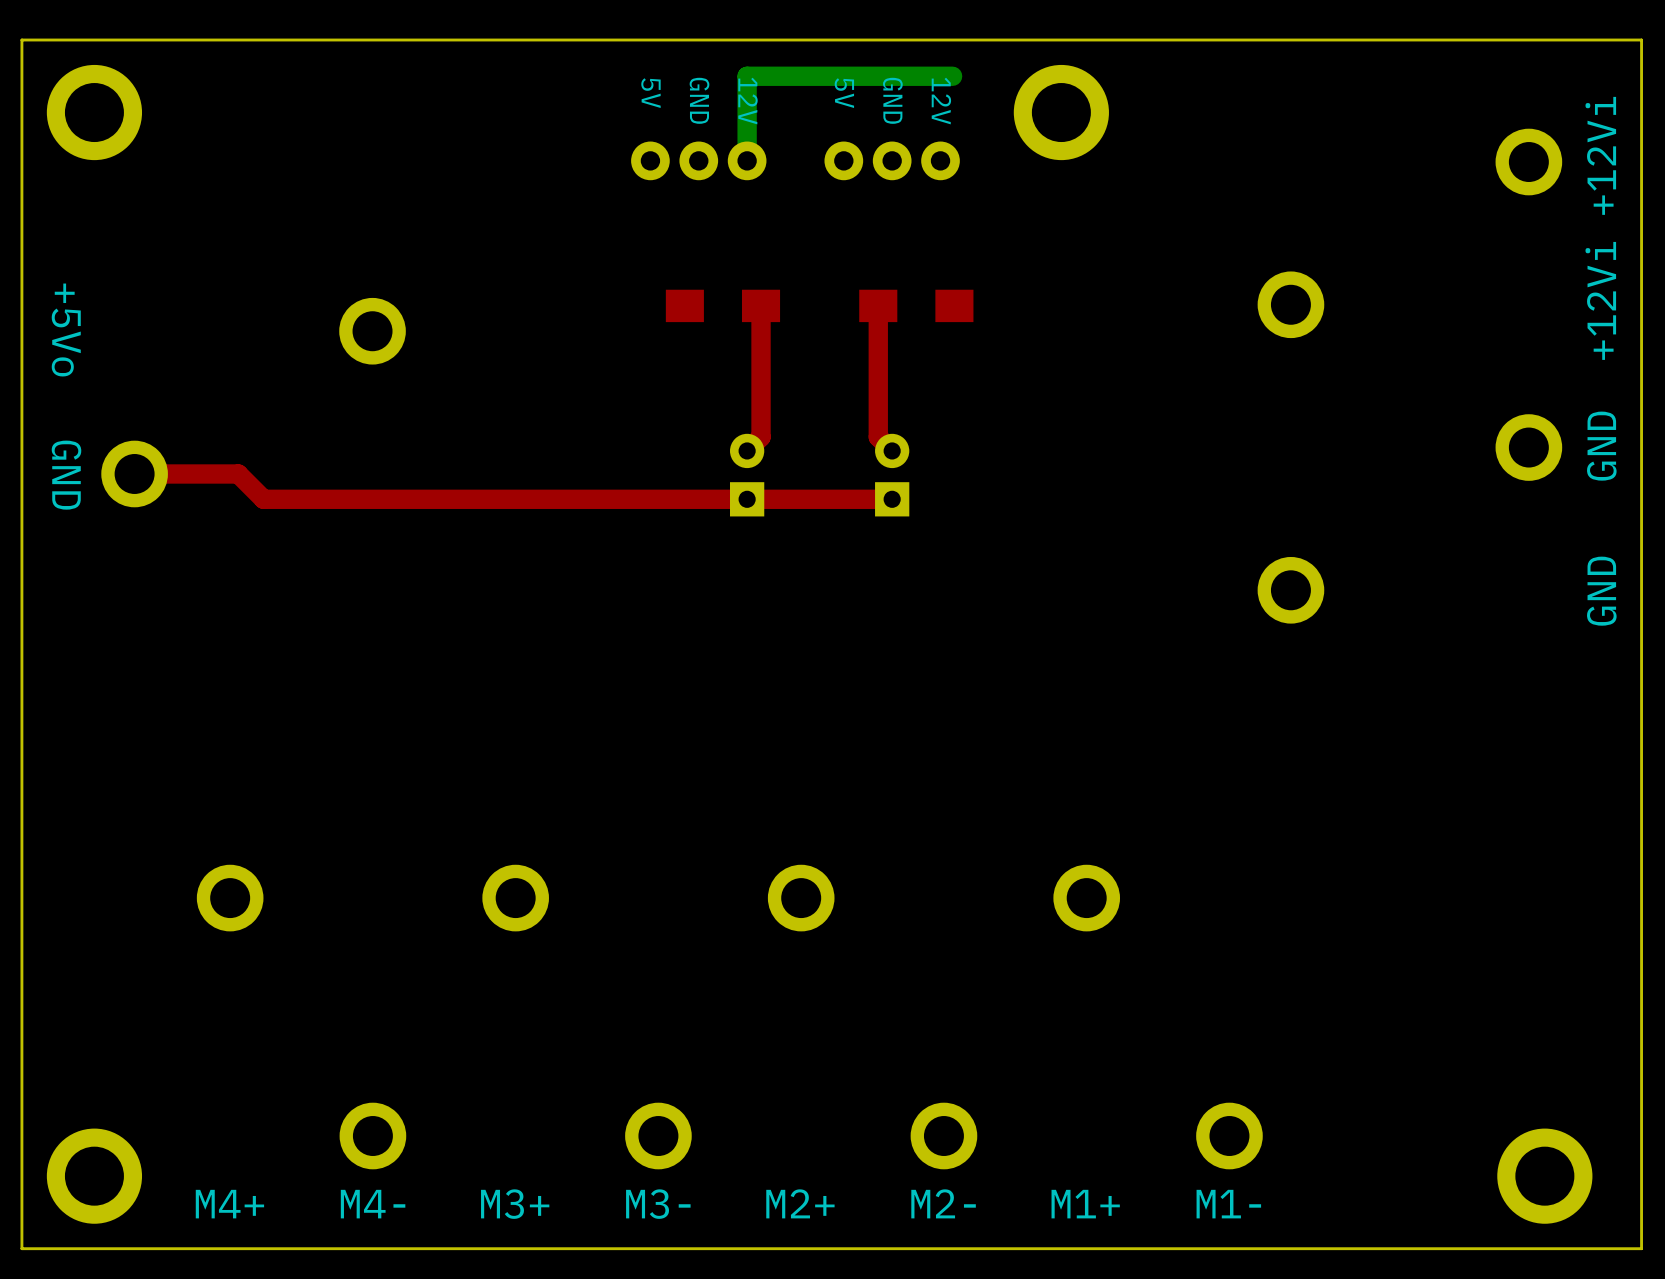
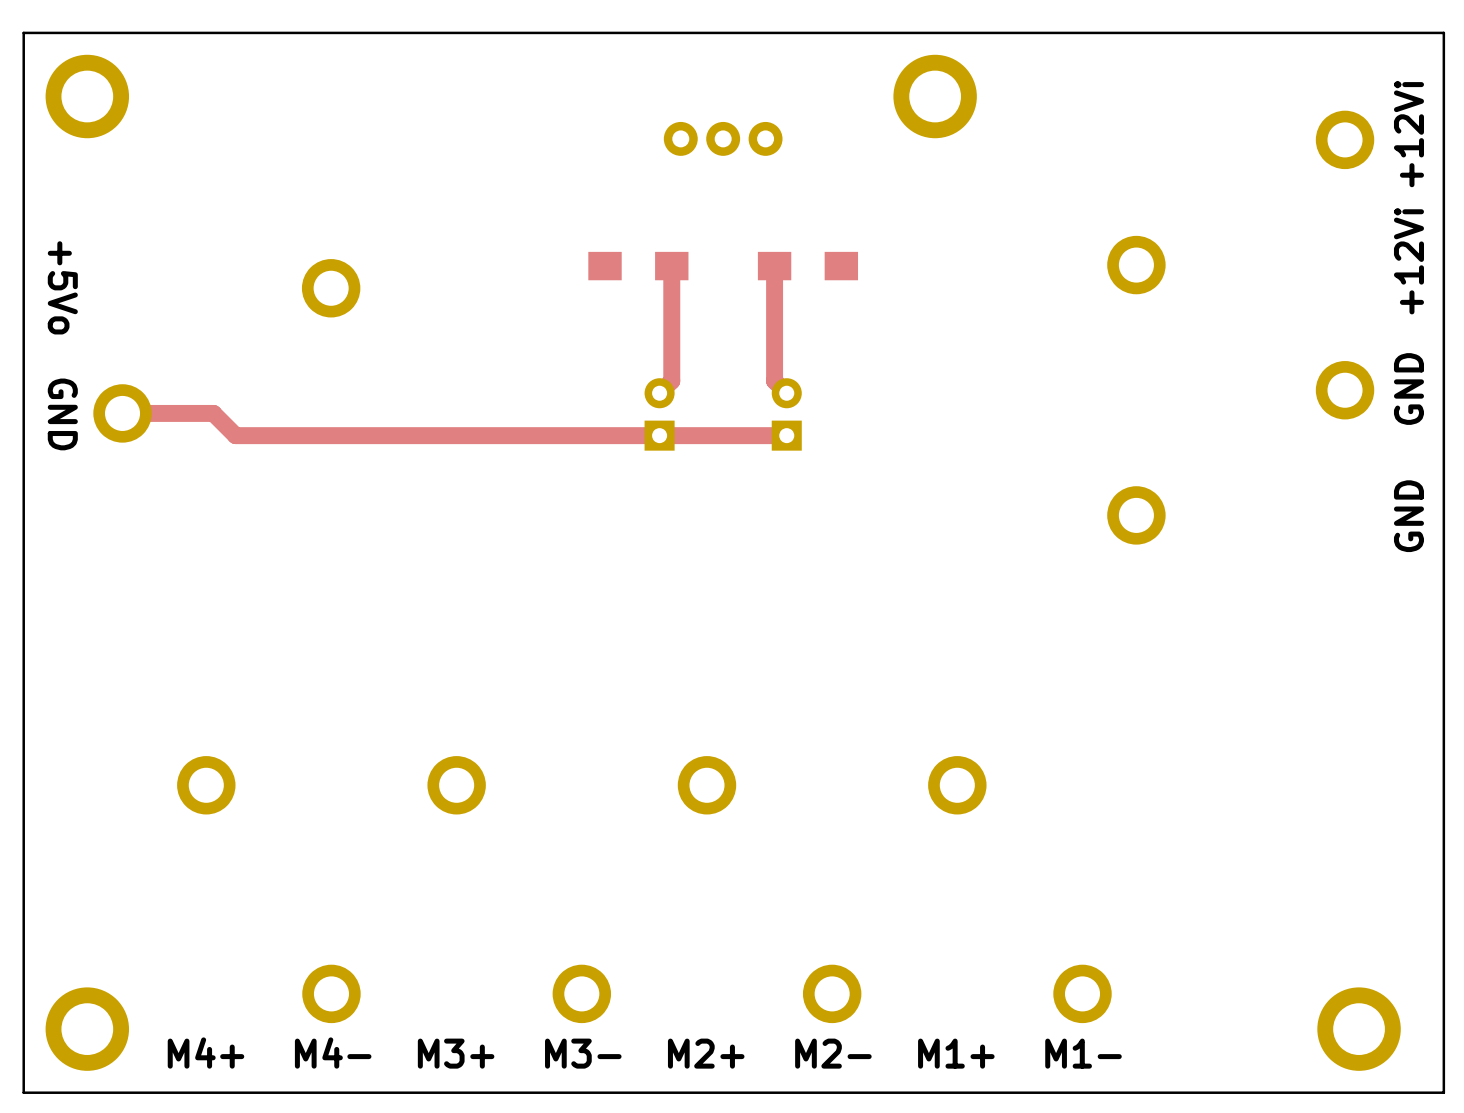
bottom track: (952, 76) (747, 76) (747, 160) -> none
text: 5V (650, 93) -> none
text: 5V (844, 93) -> none
text: GND (699, 100) -> none
text: GND (892, 100) -> none
text: 12V (748, 101) -> none
text: 12V (941, 101) -> none
part: (698, 160) -> none
part: none -> (723, 138)
part: (892, 160) -> none

